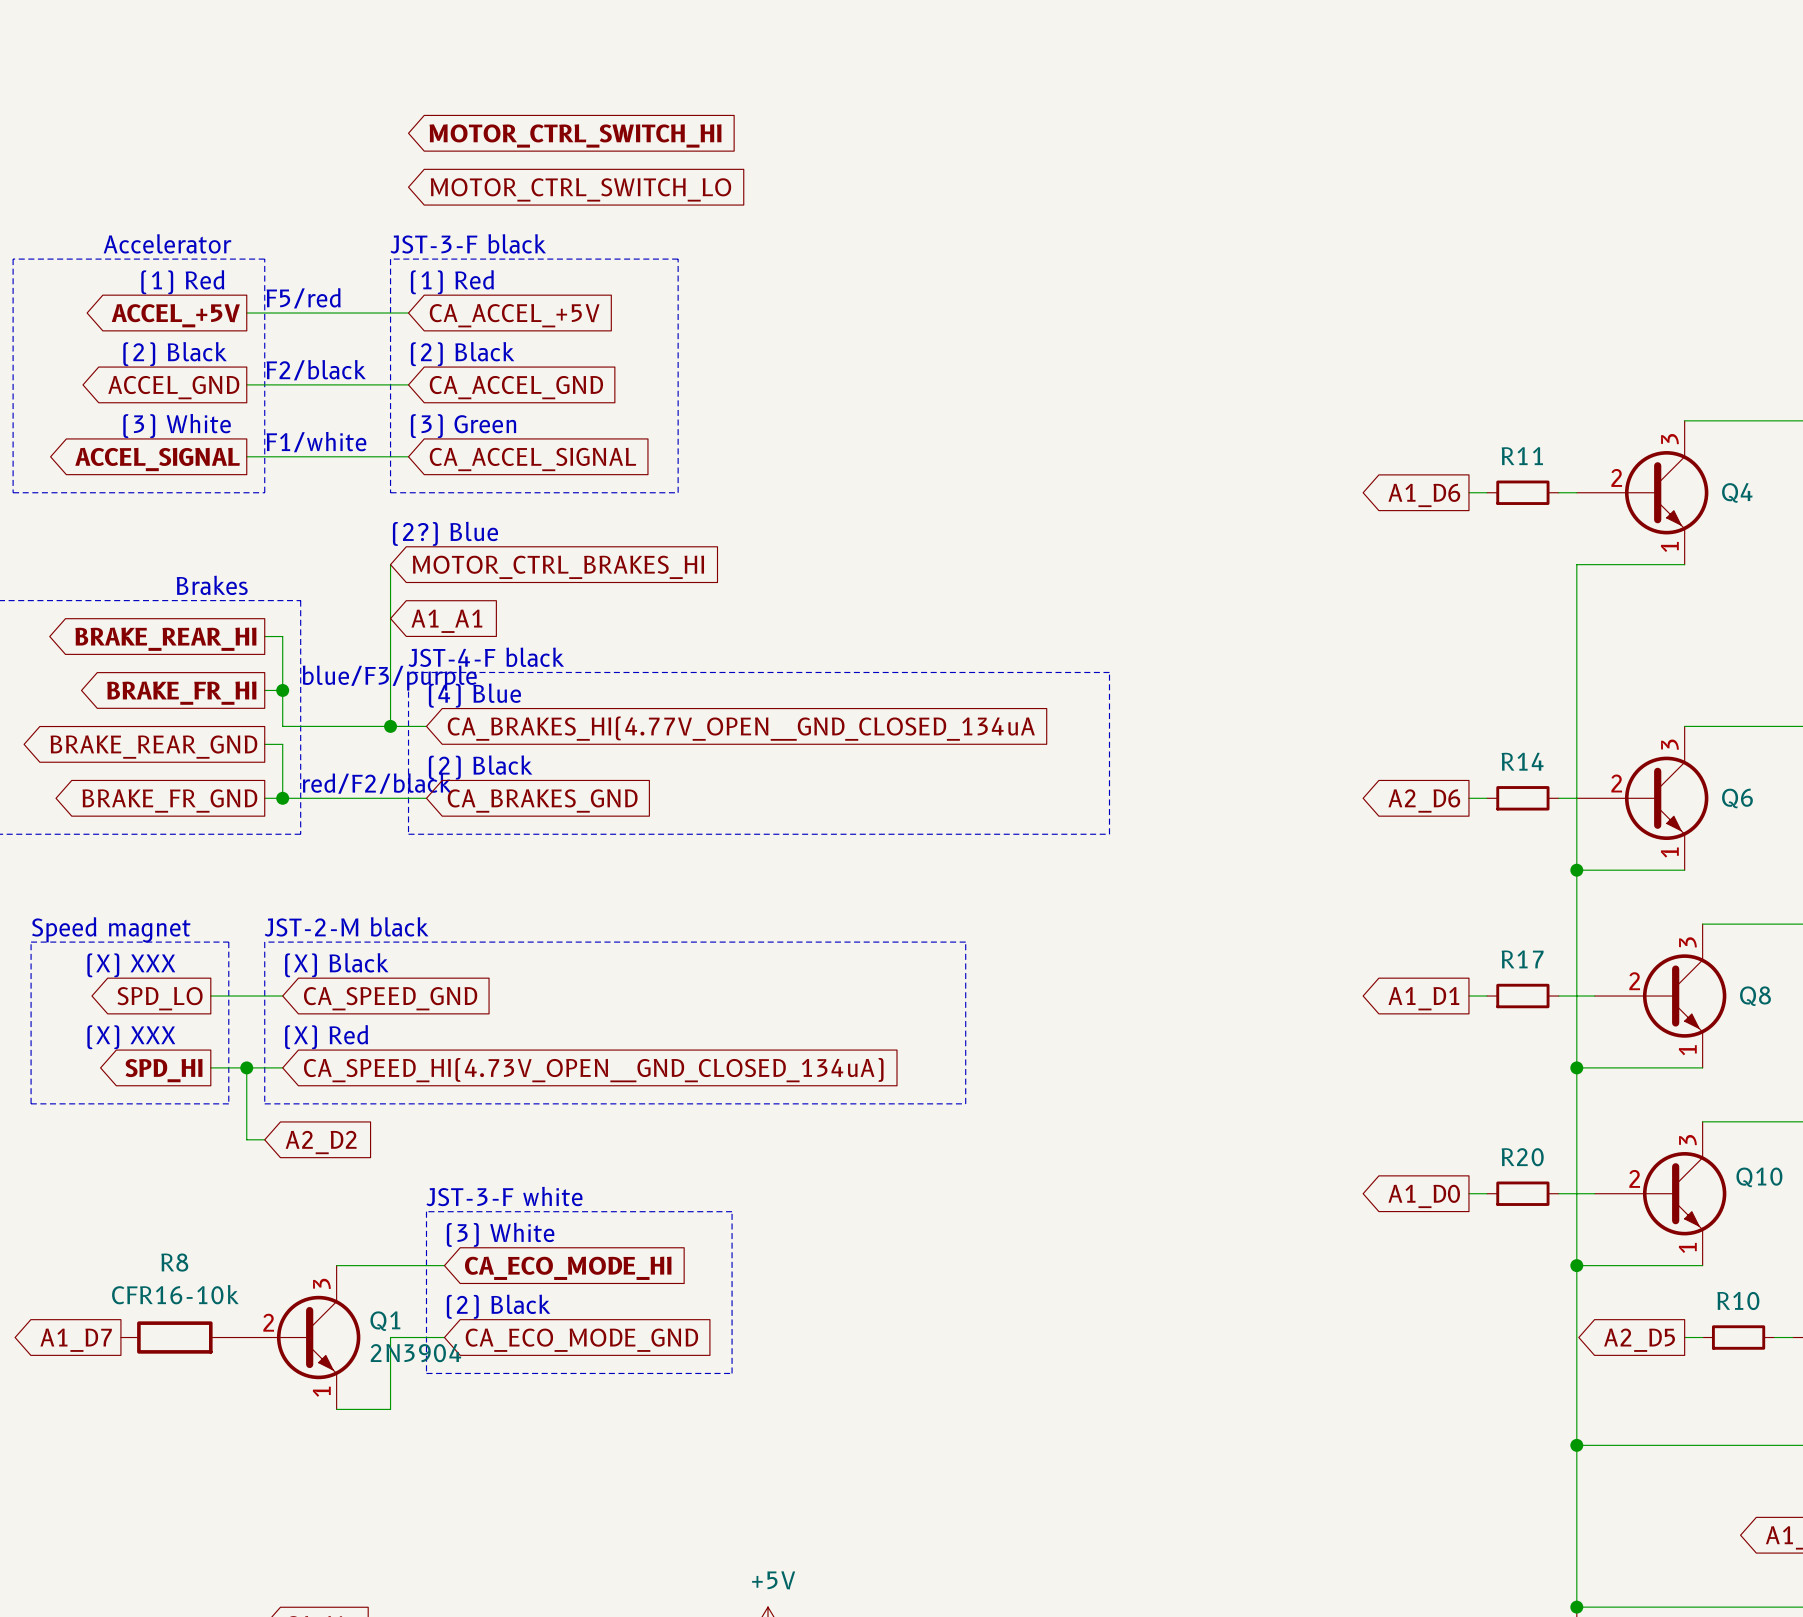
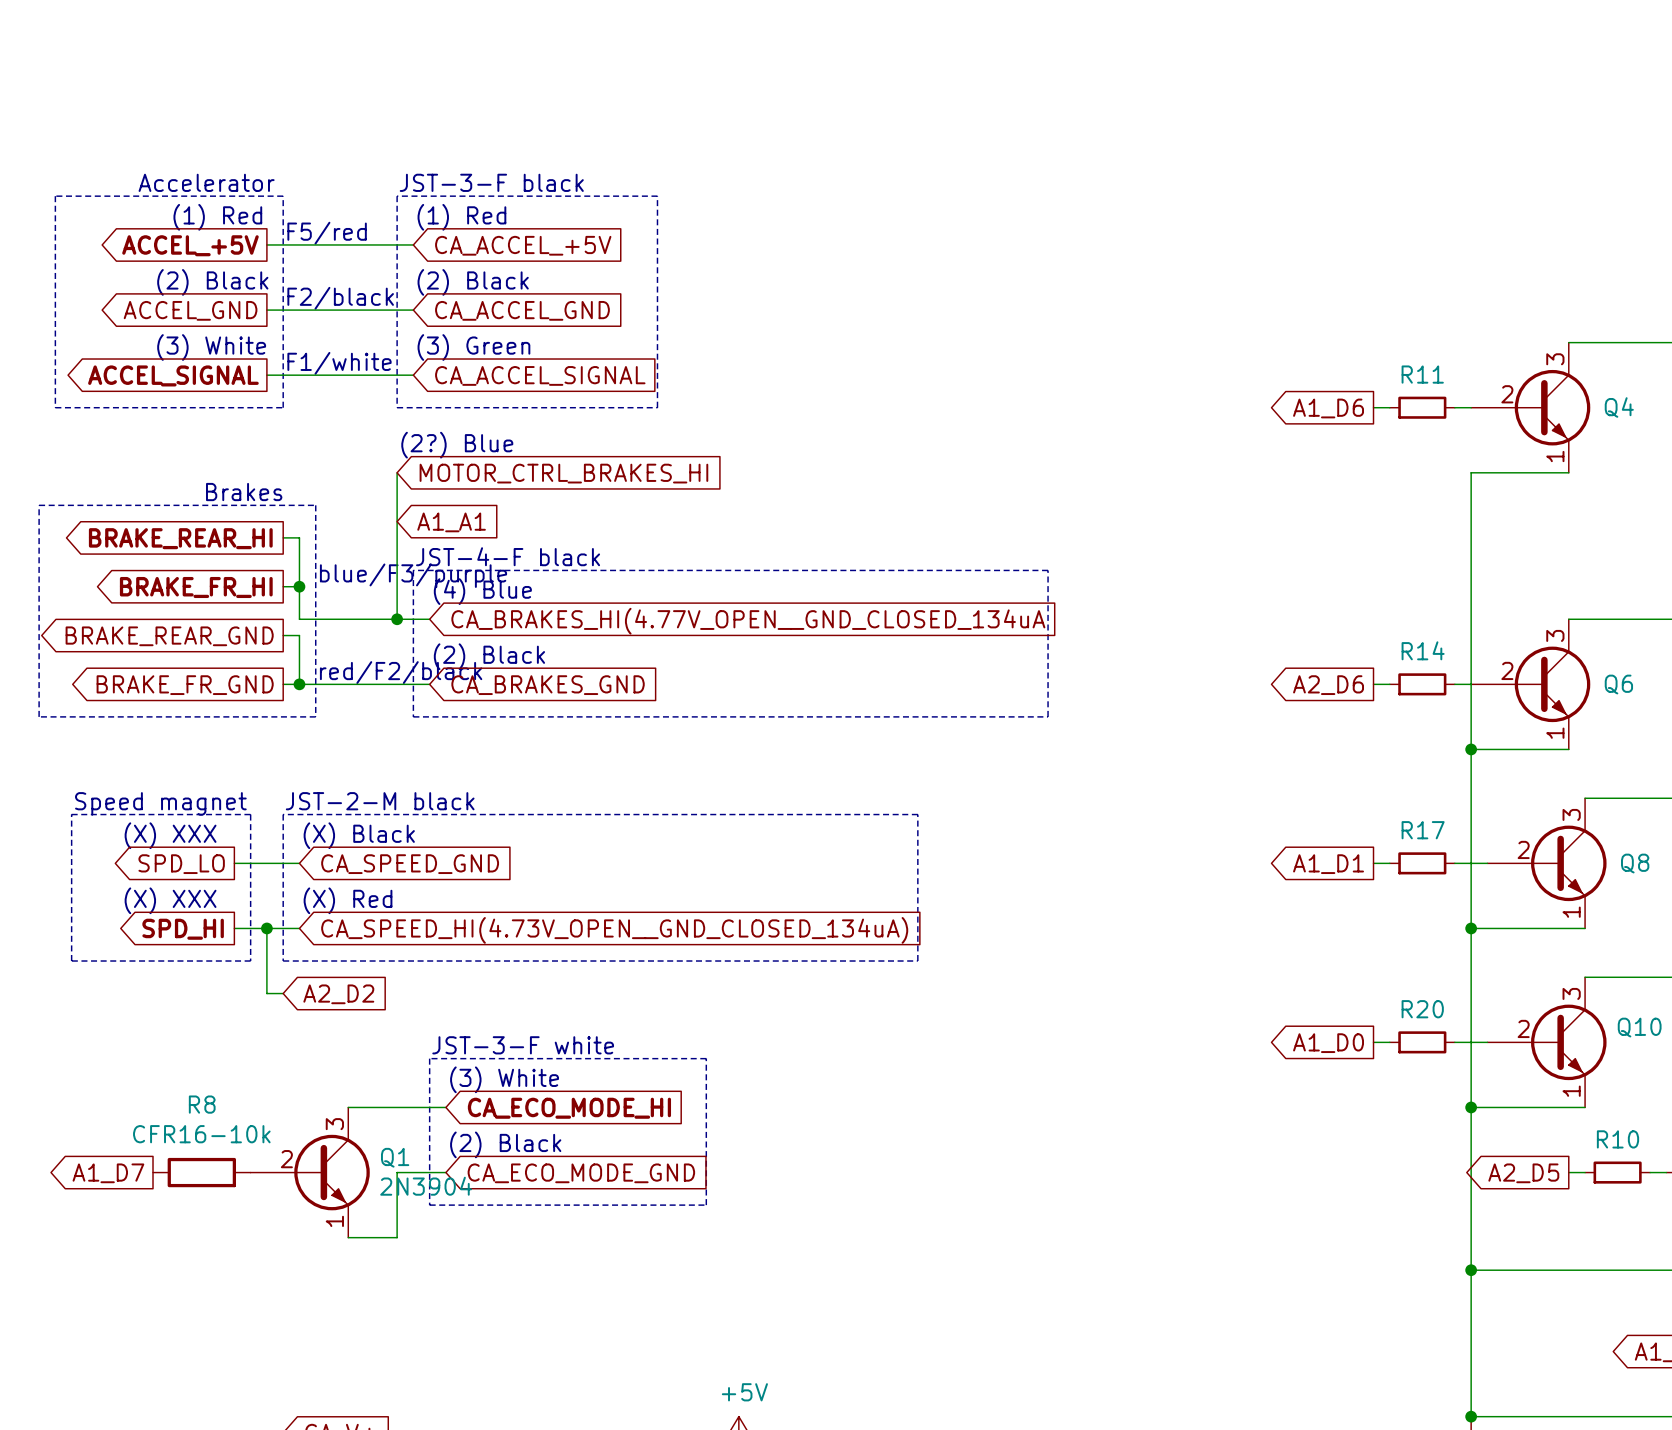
global label: MOTOR_CTRL_SWITCH_HI (575, 135) -> none
global label: MOTOR_CTRL_SWITCH_LO (580, 189) -> none

